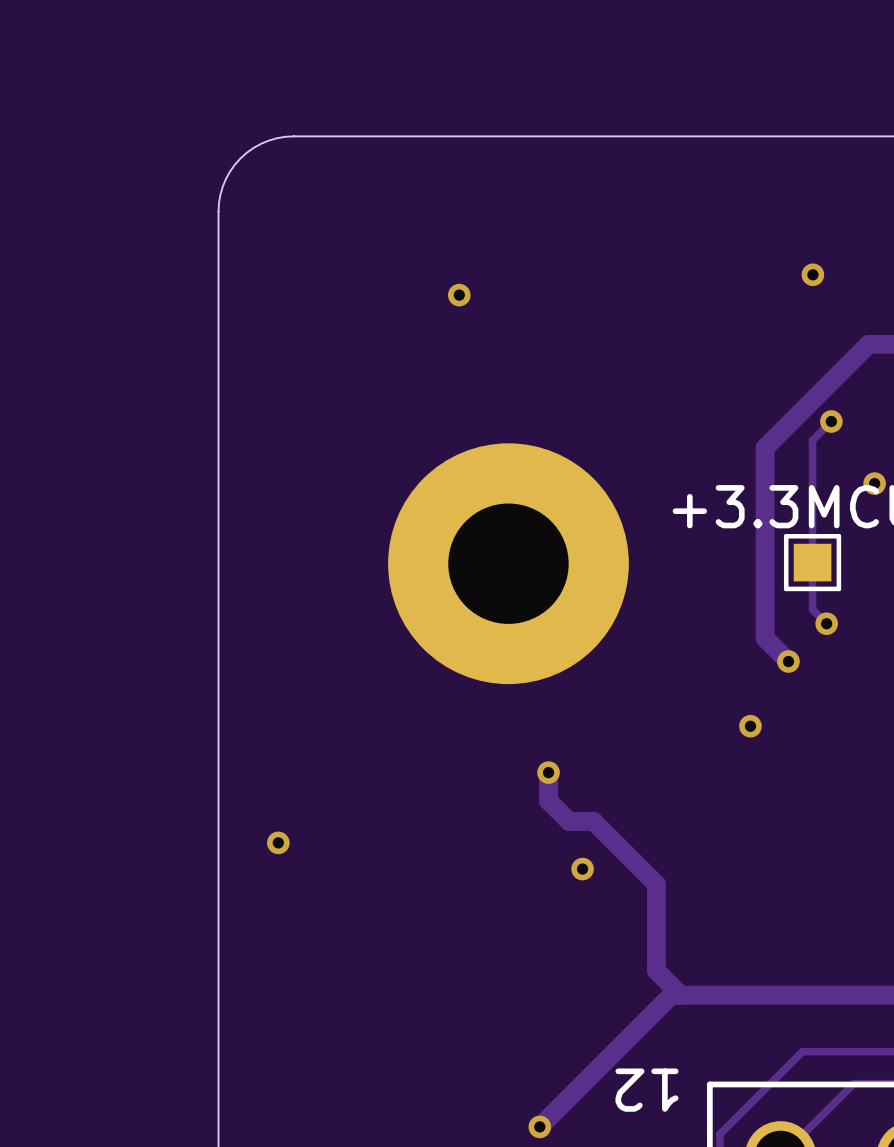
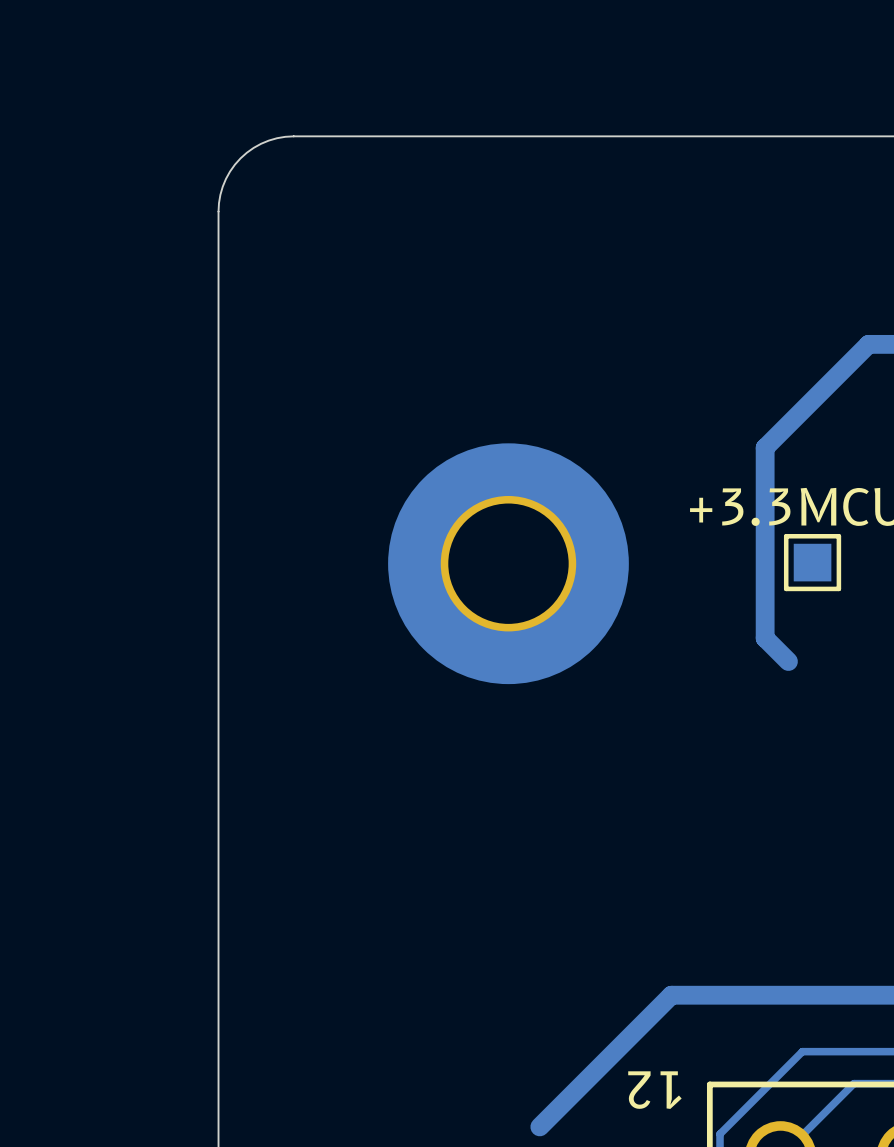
via: (812, 274) -> none
via: (459, 295) -> none
track: (831, 421) (812, 440) (812, 609) (826, 623) -> none
via: (831, 421) -> none
via: (874, 483) -> none
via: (826, 623) -> none
via: (788, 661) -> none
via: (750, 726) -> none
via: (548, 772) -> none
track: (549, 773) (548, 800) (569, 821) (593, 821) (656, 884) (656, 970) (680, 995) -> none
via: (278, 842) -> none
via: (582, 869) -> none
via: (539, 1126) -> none

